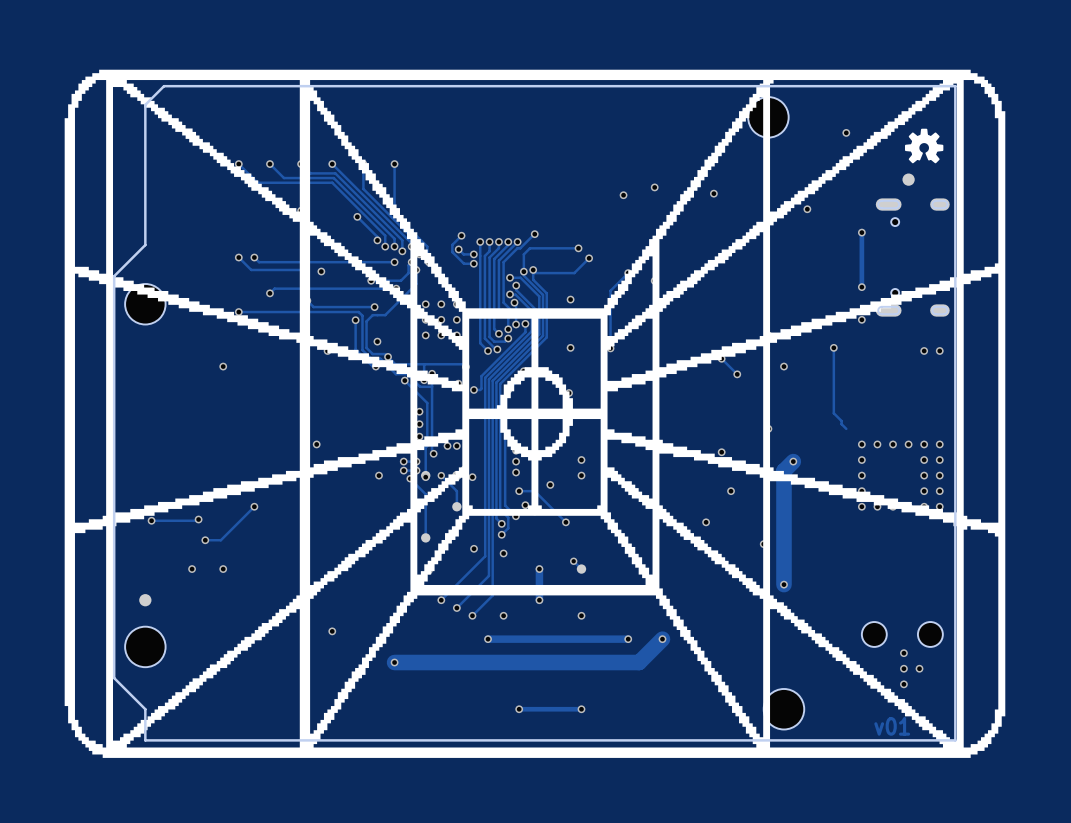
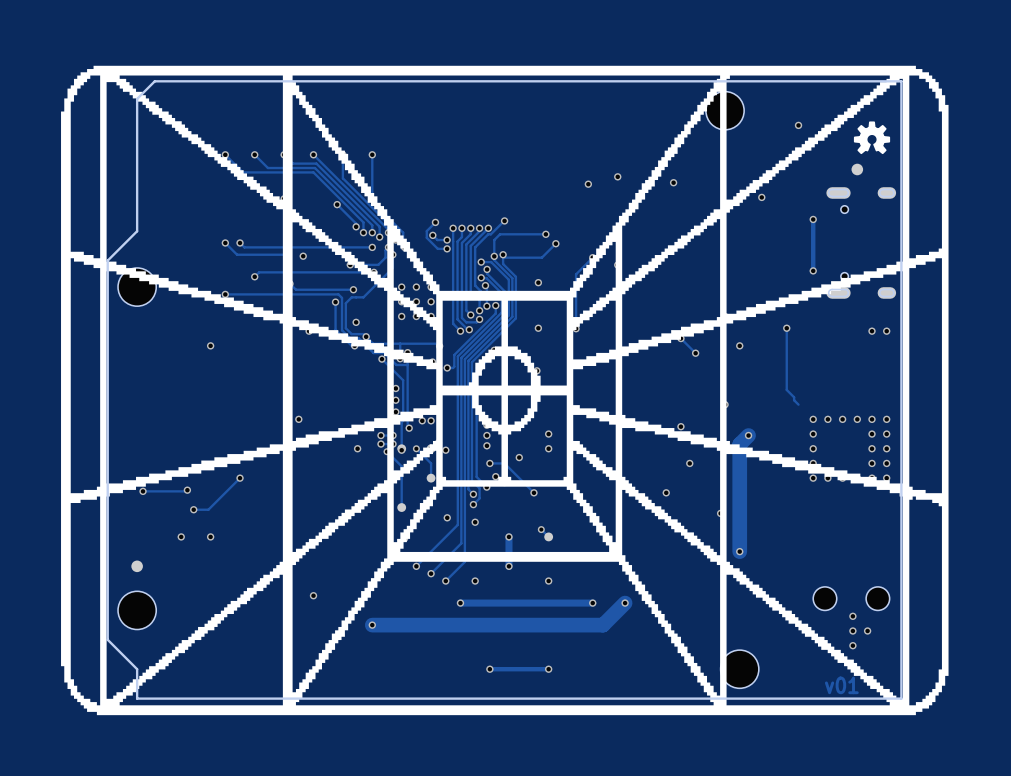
via: (861, 319) -> none

